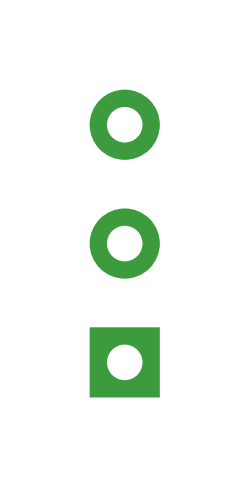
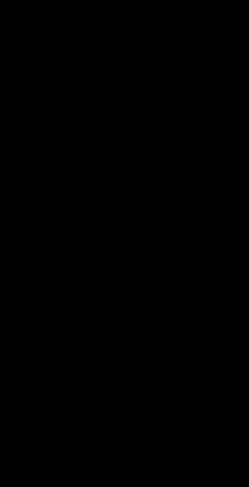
part: (124, 243) -> none

